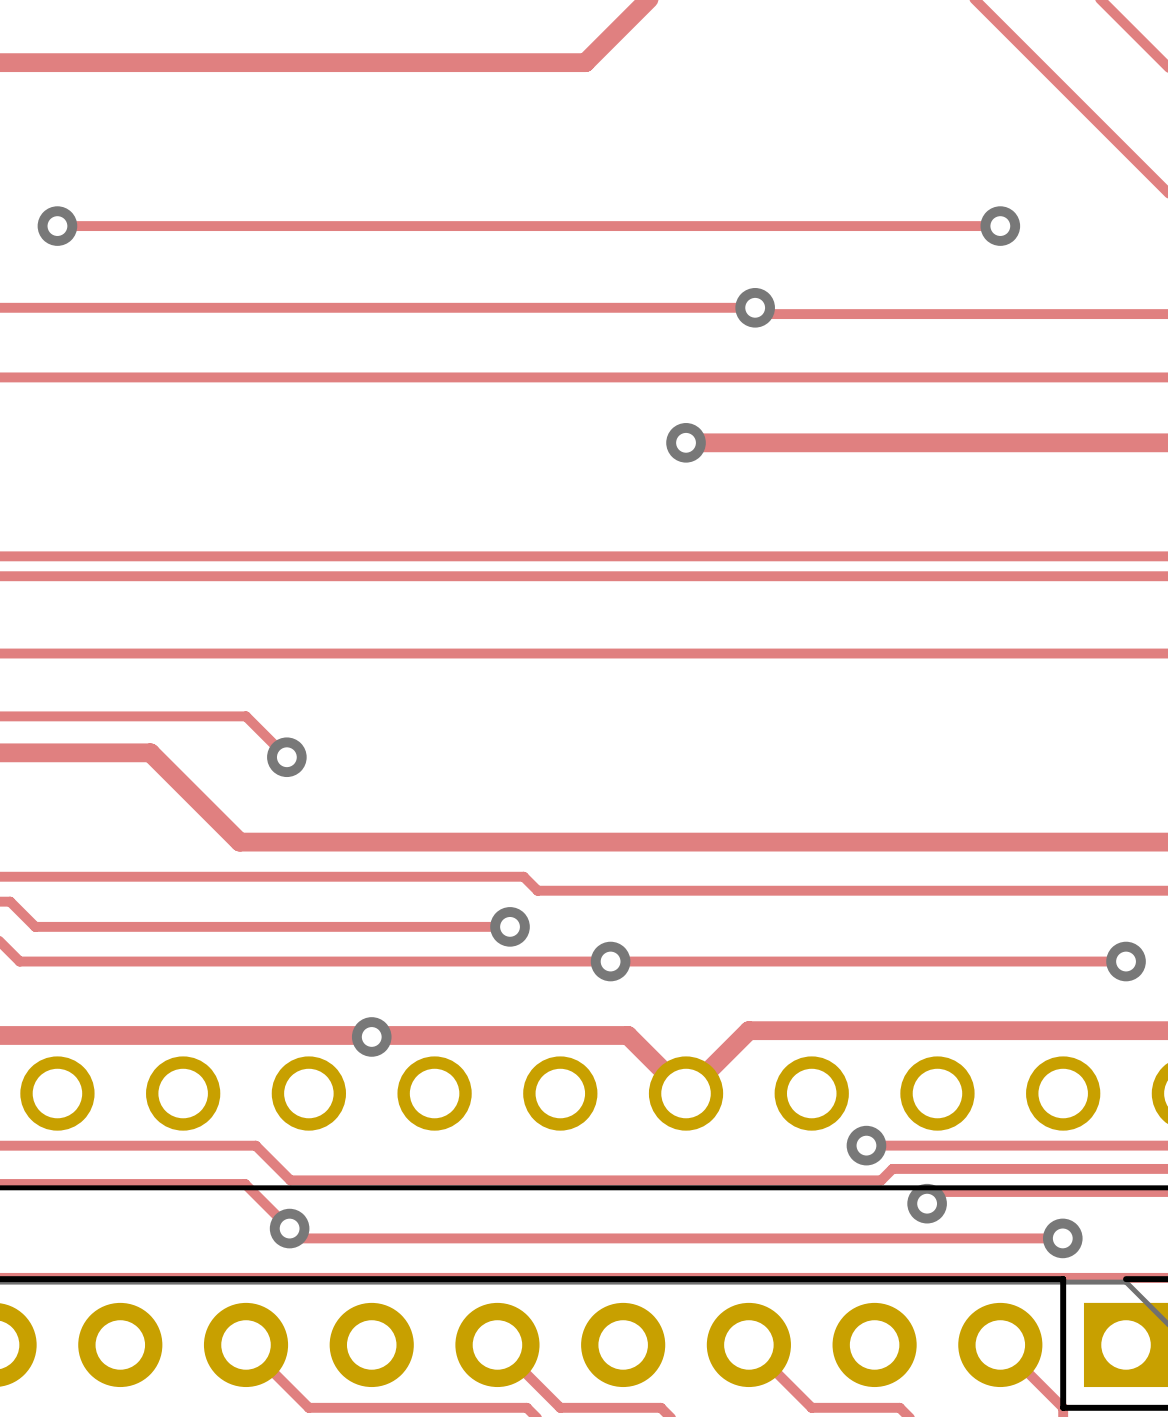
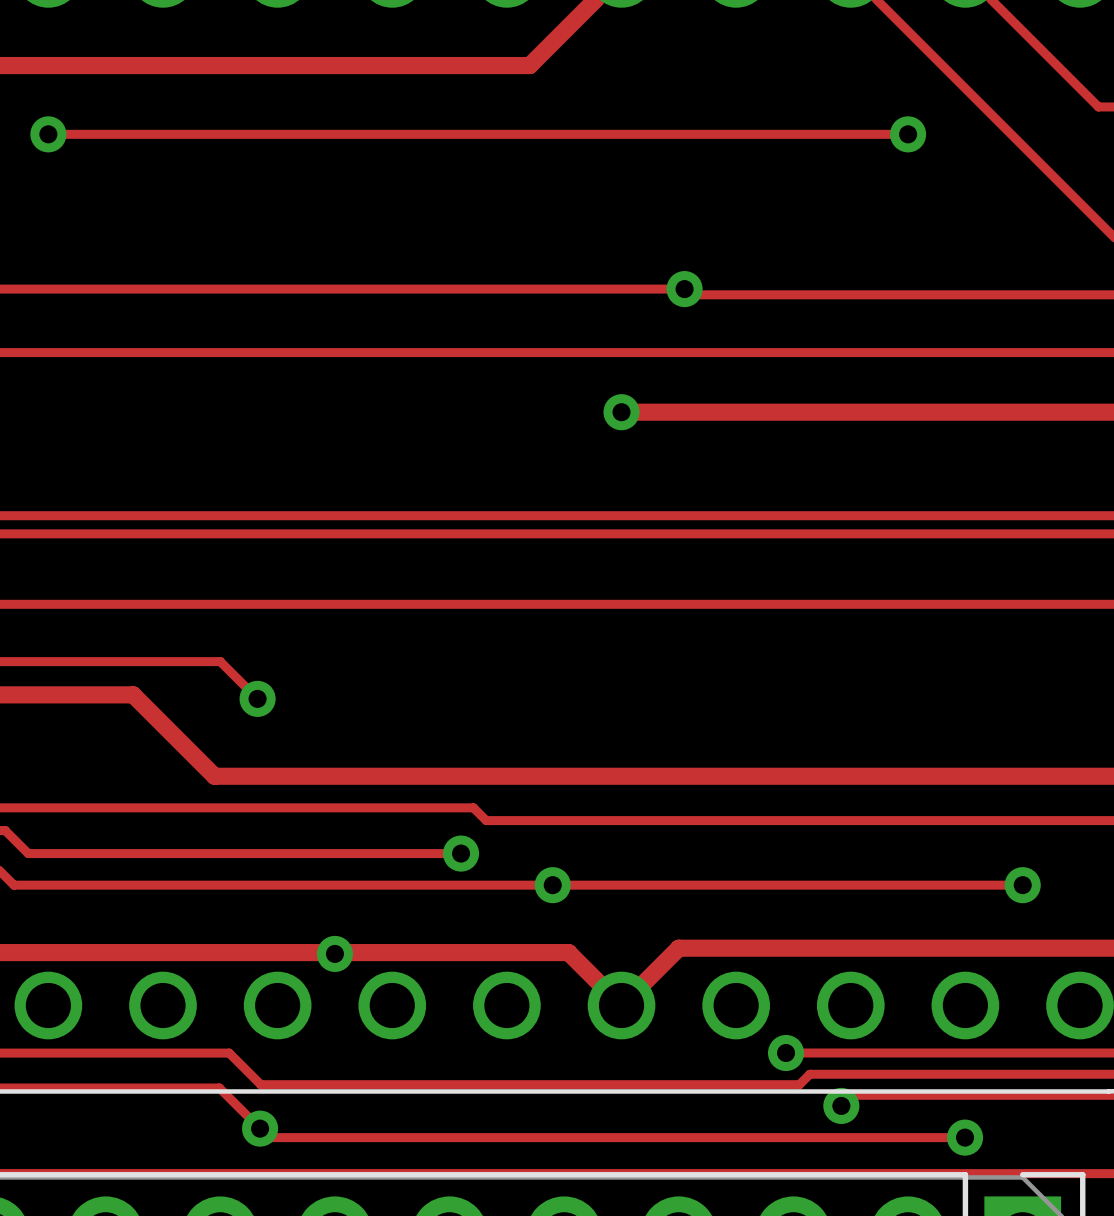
track: (57, 226) (1000, 226) -> (48, 134) (908, 134)
via position: (57, 226) -> (48, 134)
via position: (1000, 226) -> (908, 134)

